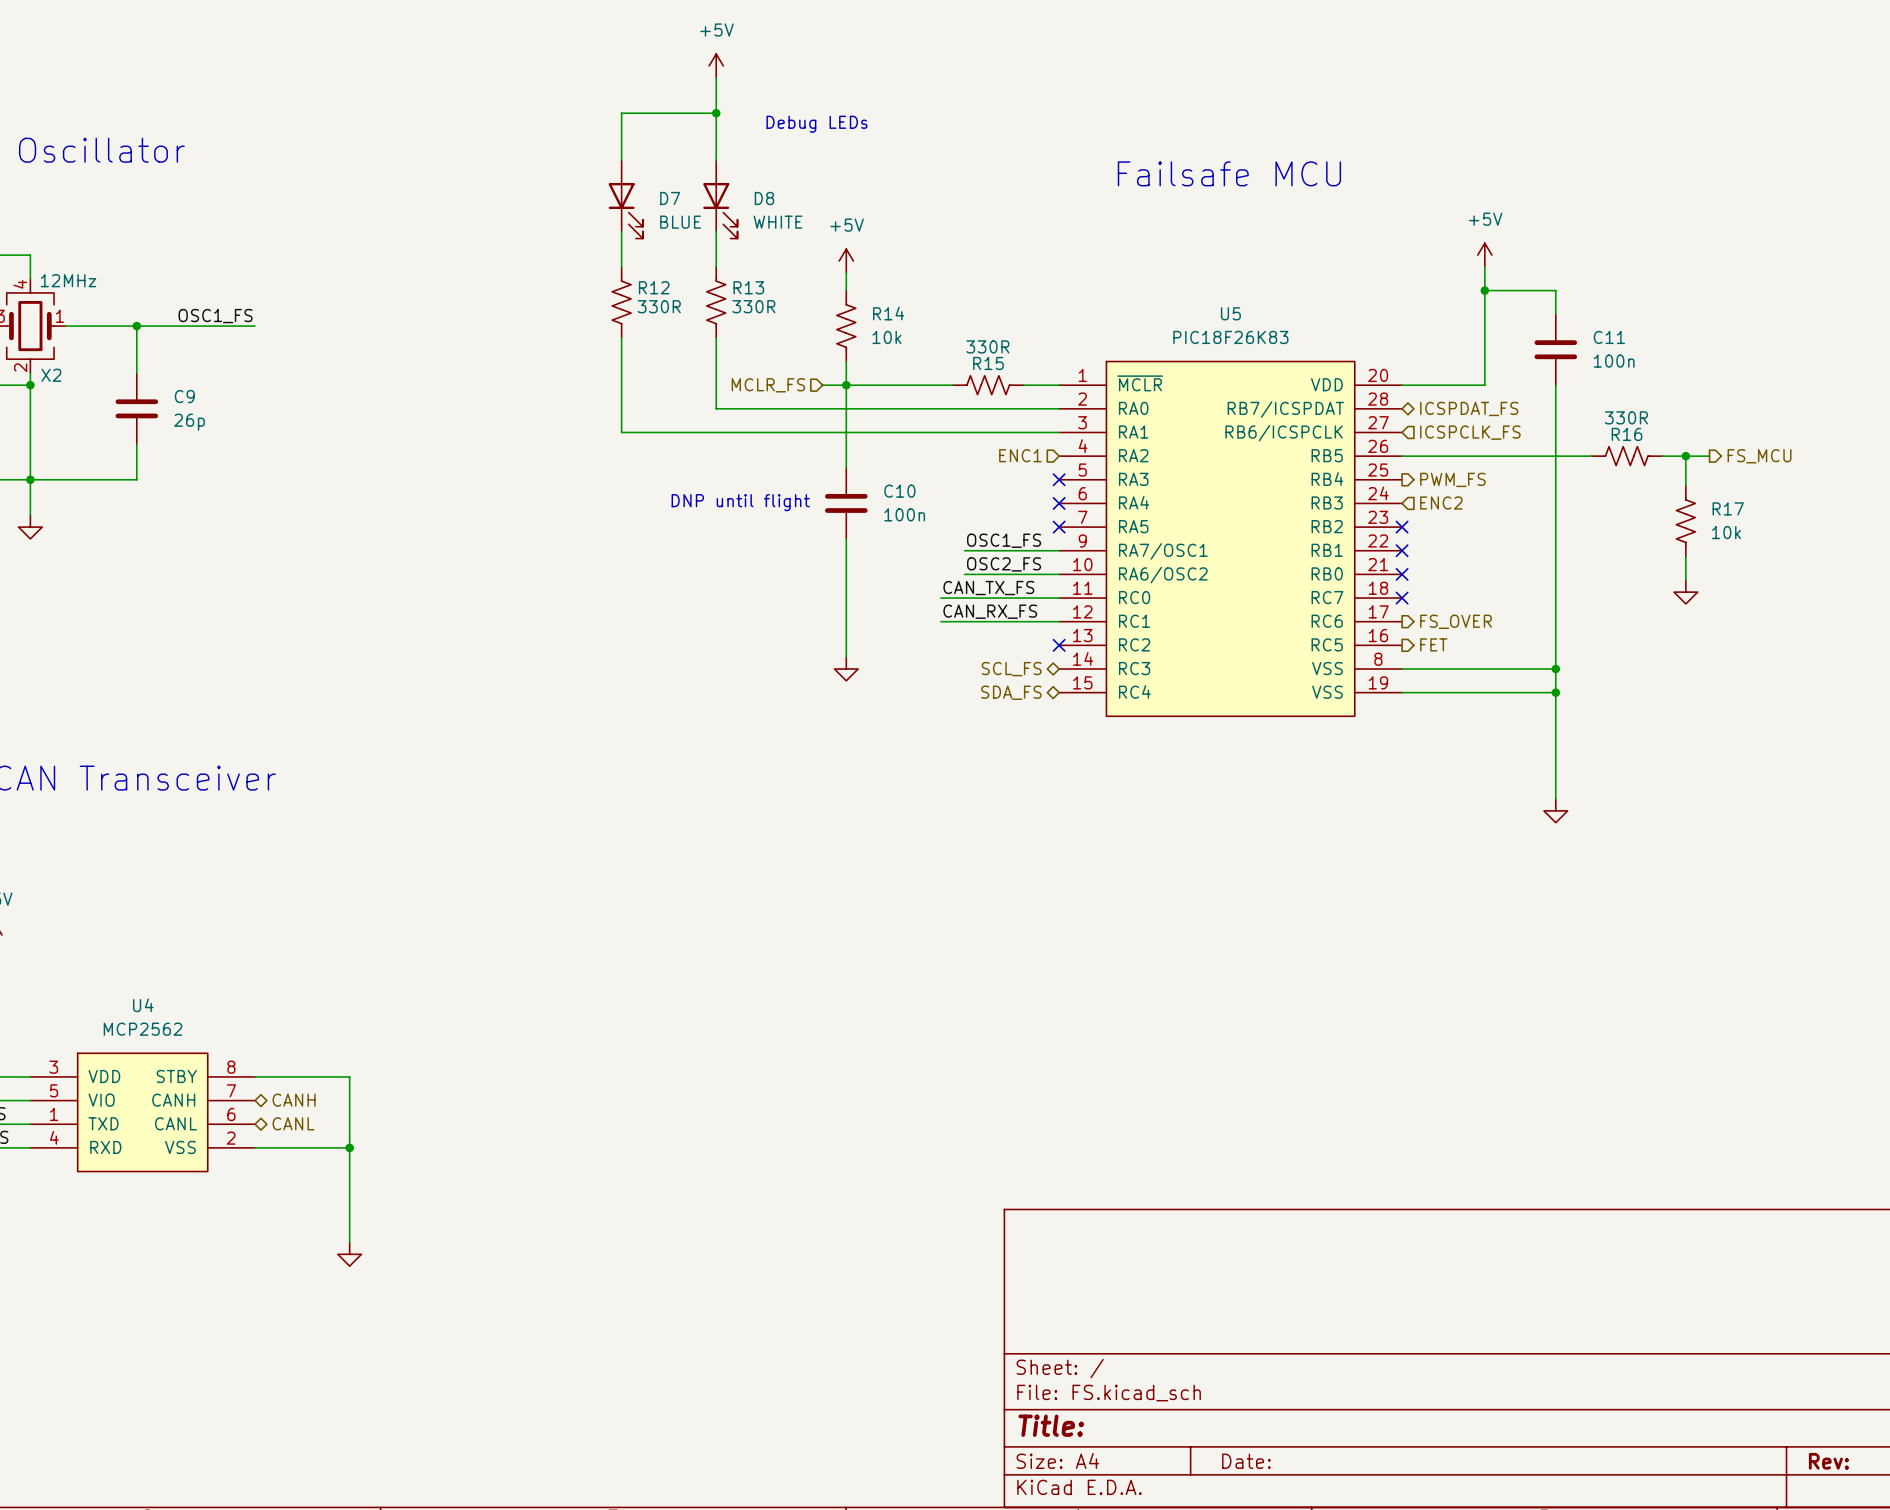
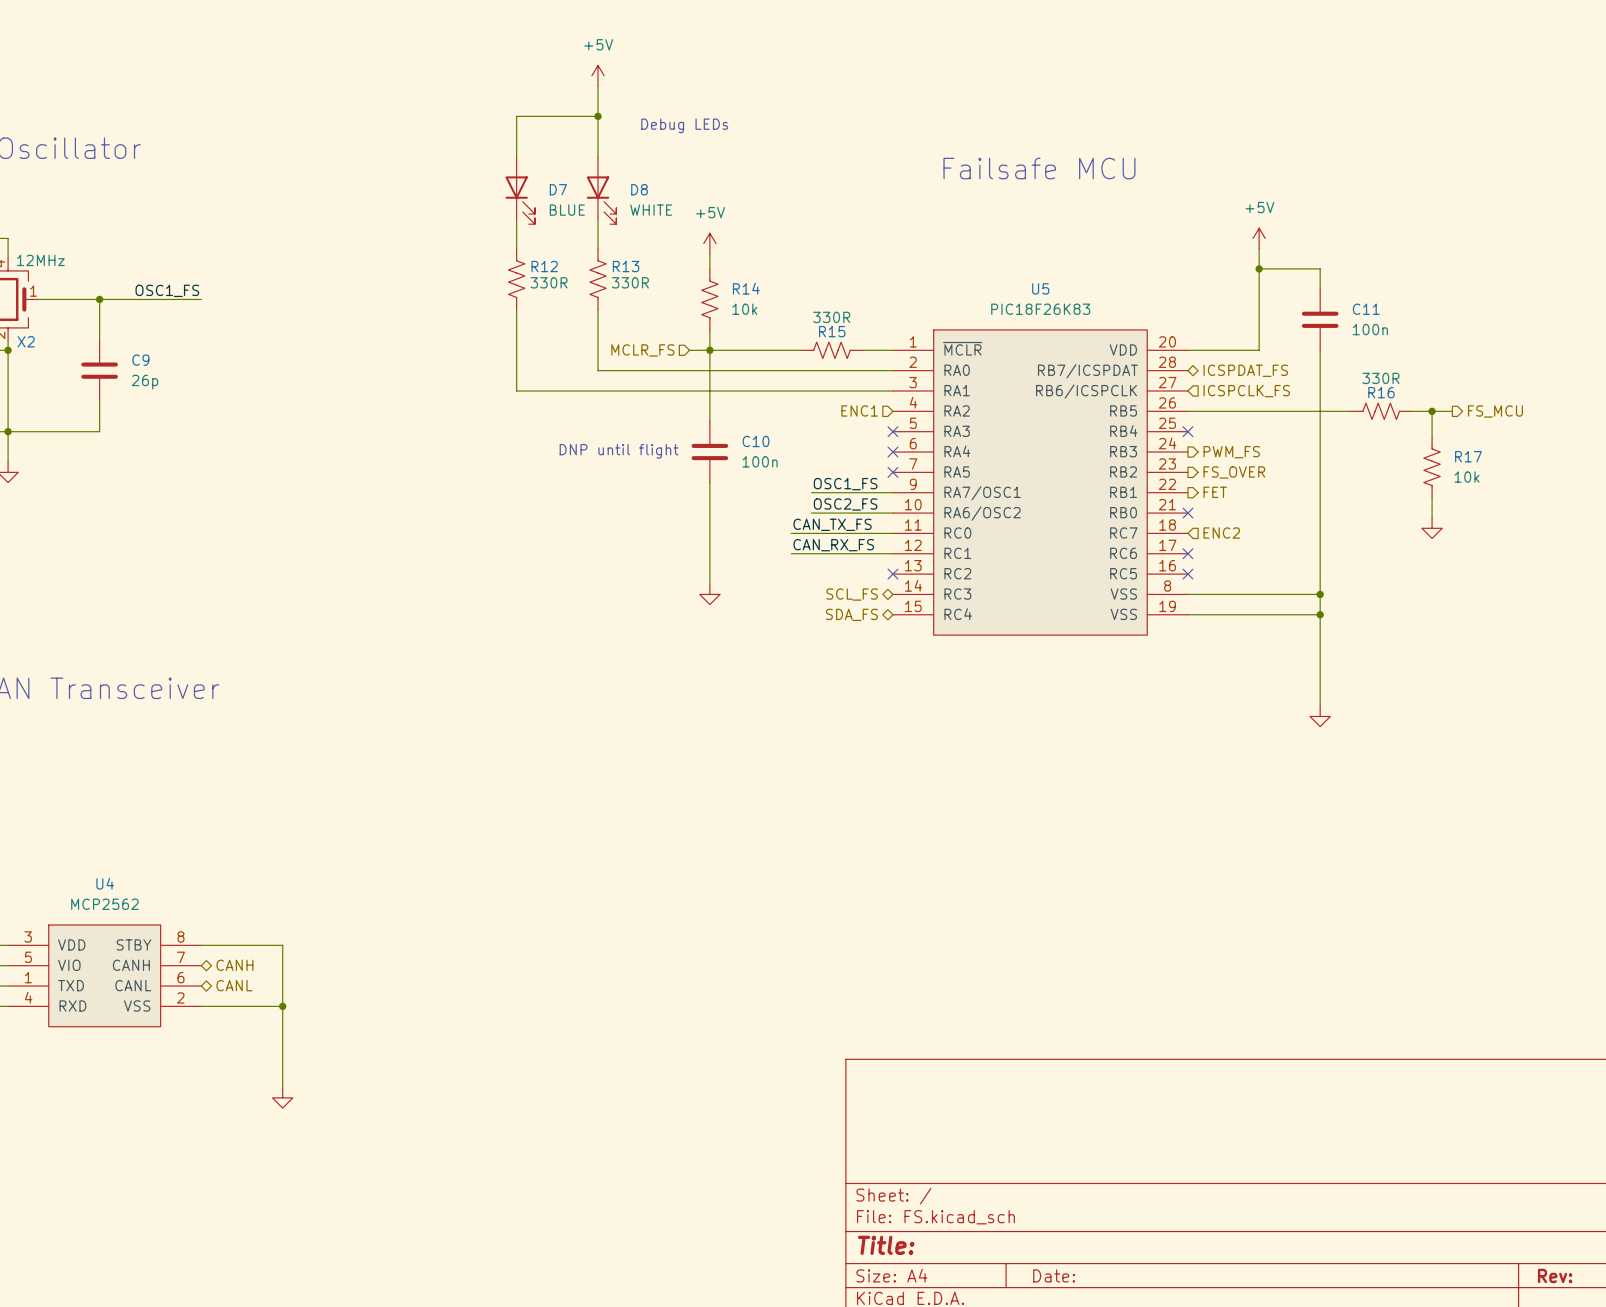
no-connect mark: none -> (1187, 431)
hierarchical label: PWM_FS (1452, 479) -> none
hierarchical label shape: input (1441, 502) -> output (1231, 452)
hierarchical label: ENC2 (1441, 502) -> PWM_FS (1231, 452)
no-connect mark: (1402, 527) -> none
no-connect mark: (1402, 550) -> none
hierarchical label: none -> ENC2 (1221, 533)
no-connect mark: (1402, 598) -> none
no-connect mark: none -> (1187, 553)
hierarchical label position: FS_OVER (1456, 621) -> FS_OVER (1234, 472)
hierarchical label position: FET (1433, 644) -> FET (1215, 492)
no-connect mark: none -> (1187, 574)

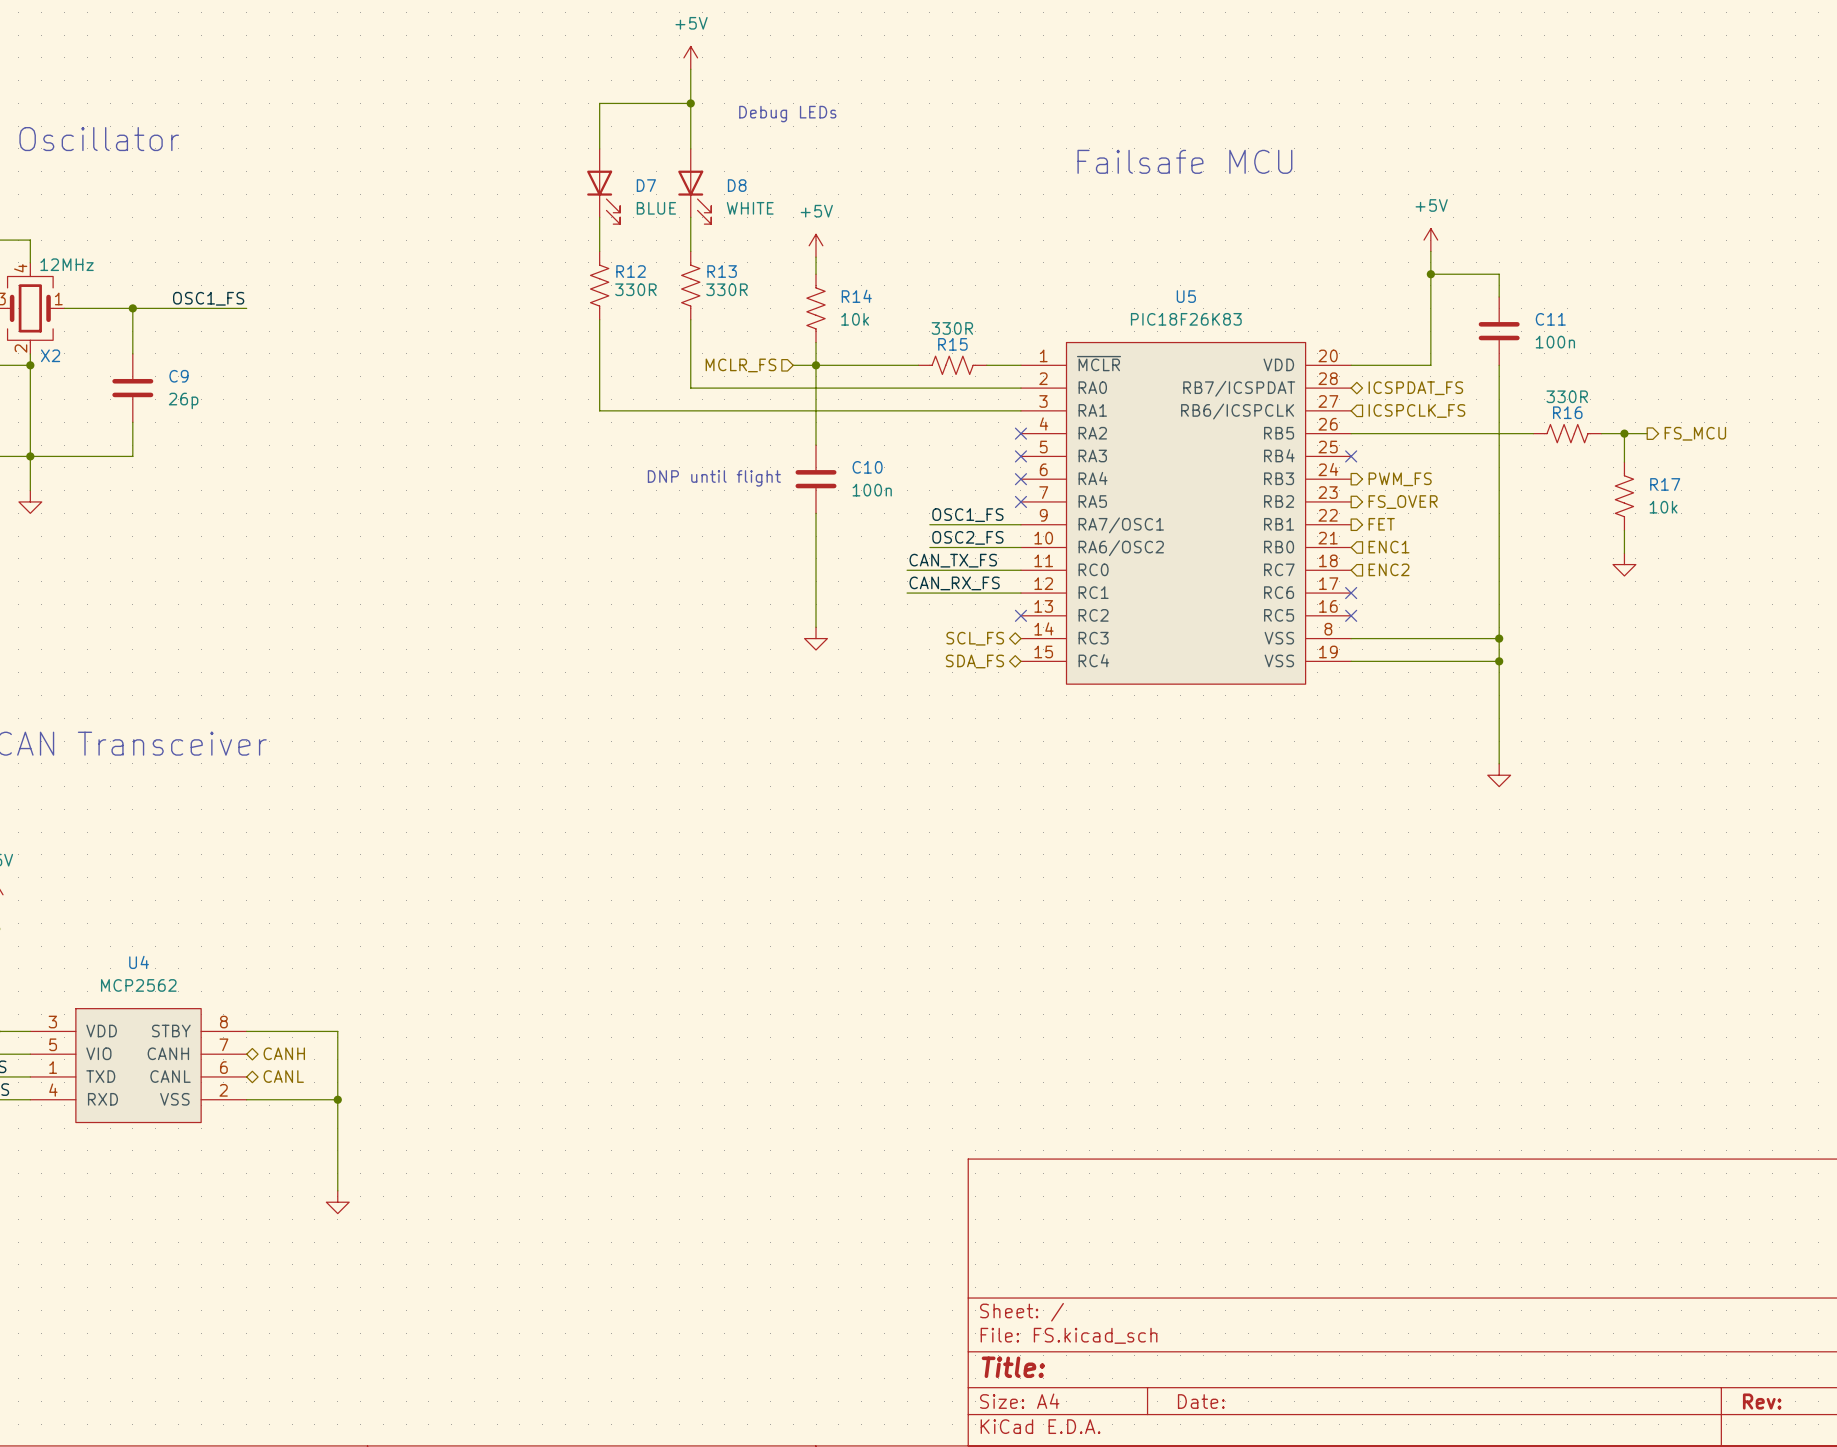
hierarchical label: ENC1 (859, 410) -> none
no-connect mark: none -> (1020, 433)
hierarchical label: none -> ENC1 (1389, 547)
no-connect mark: (1187, 513) -> none

